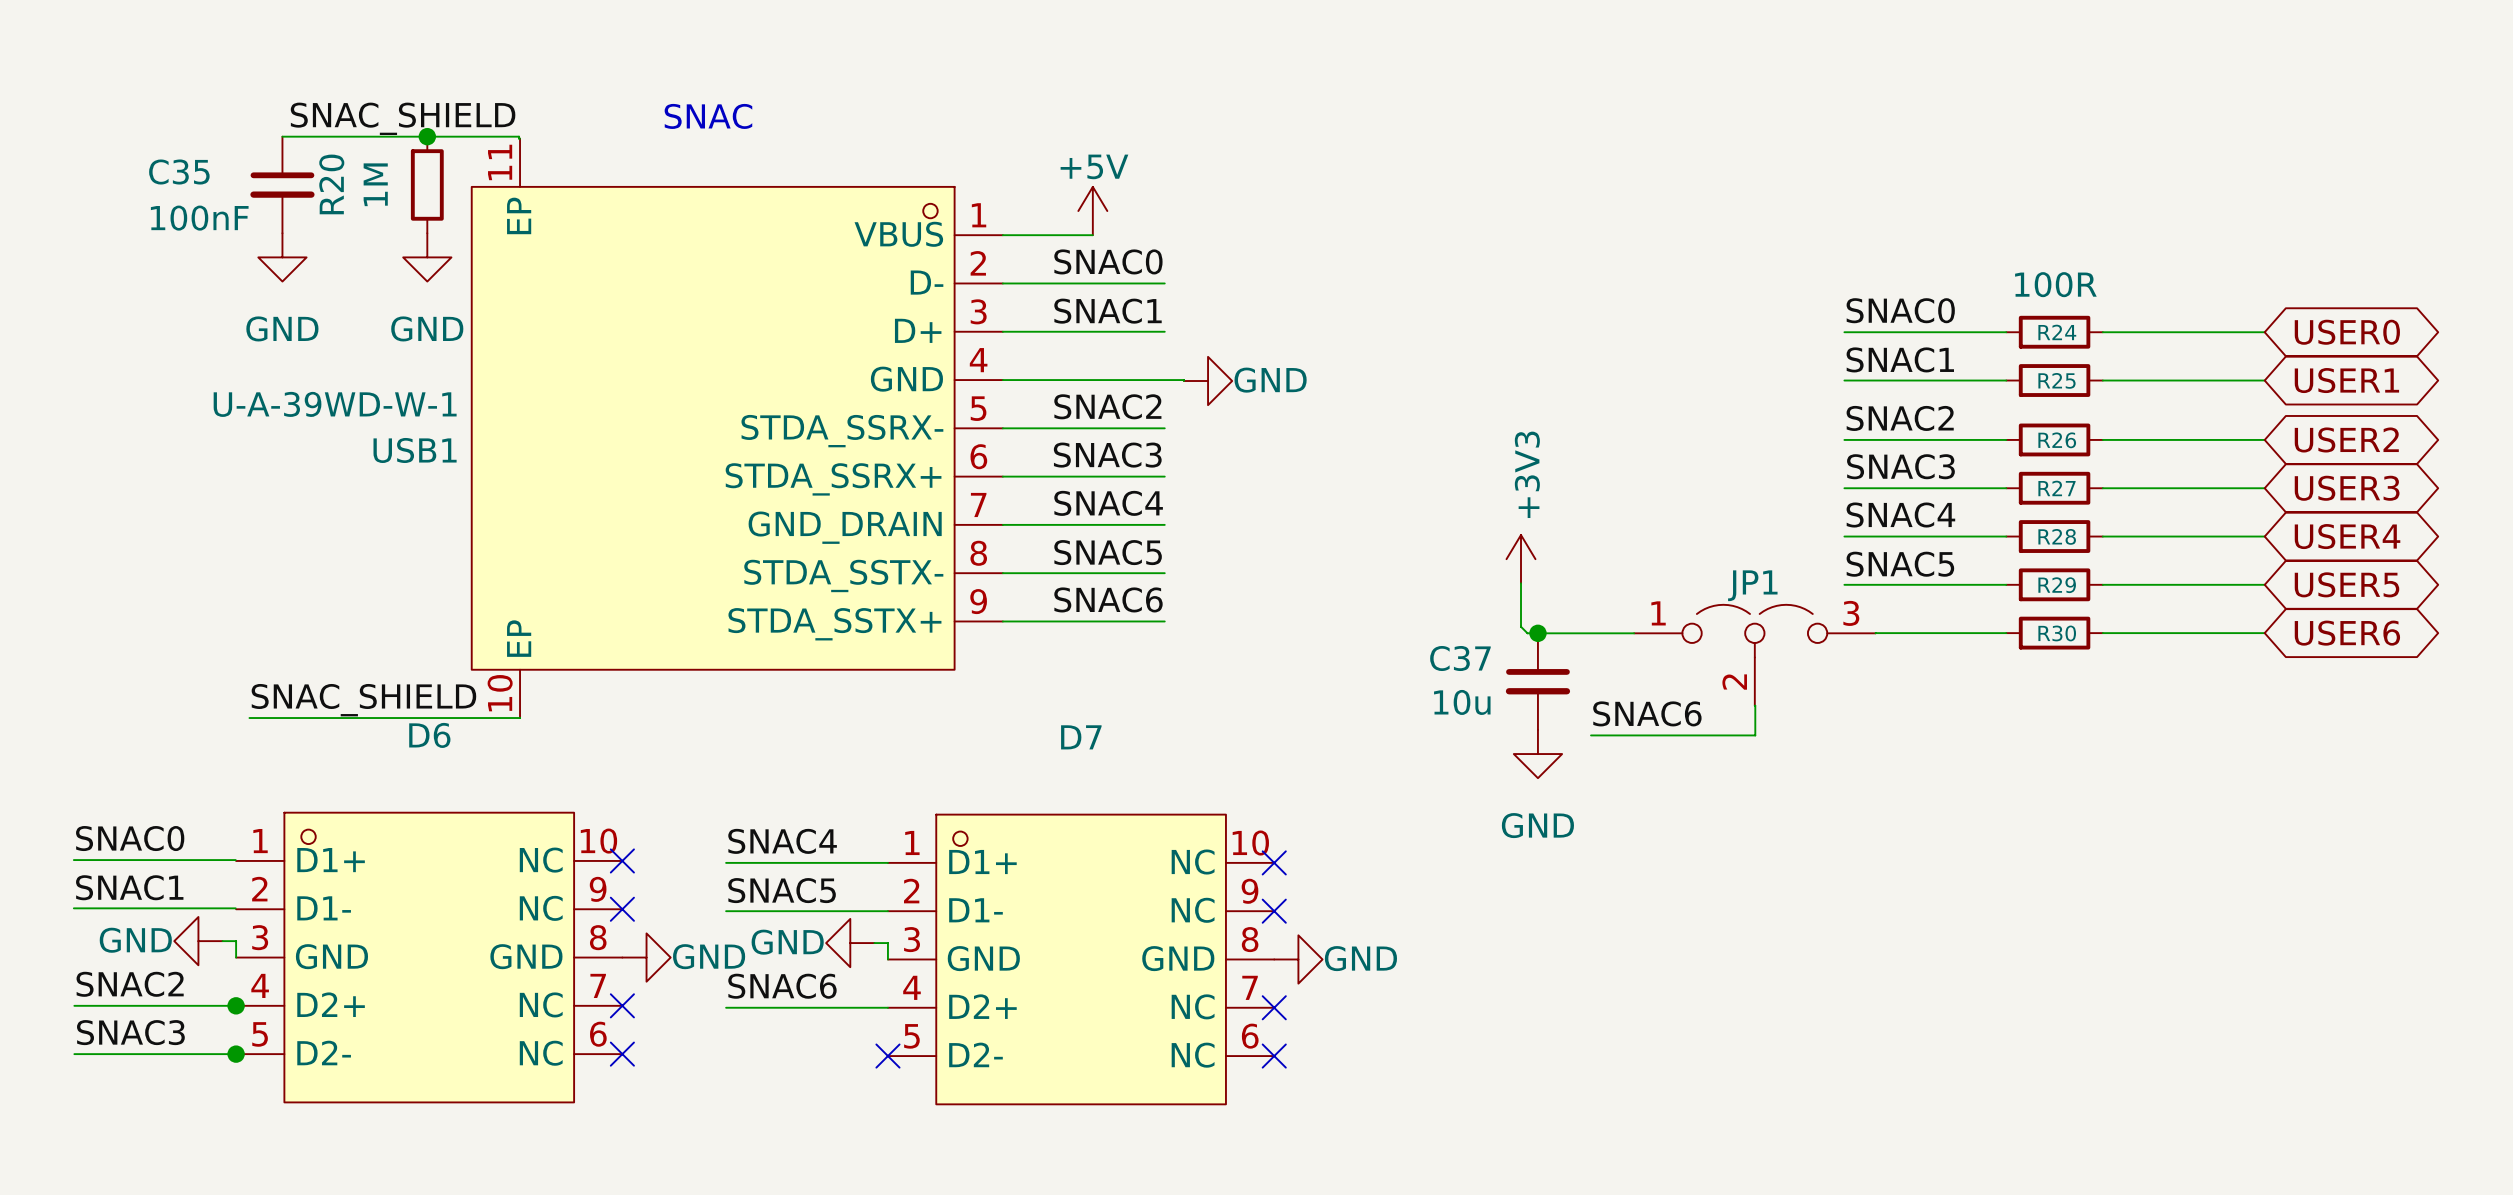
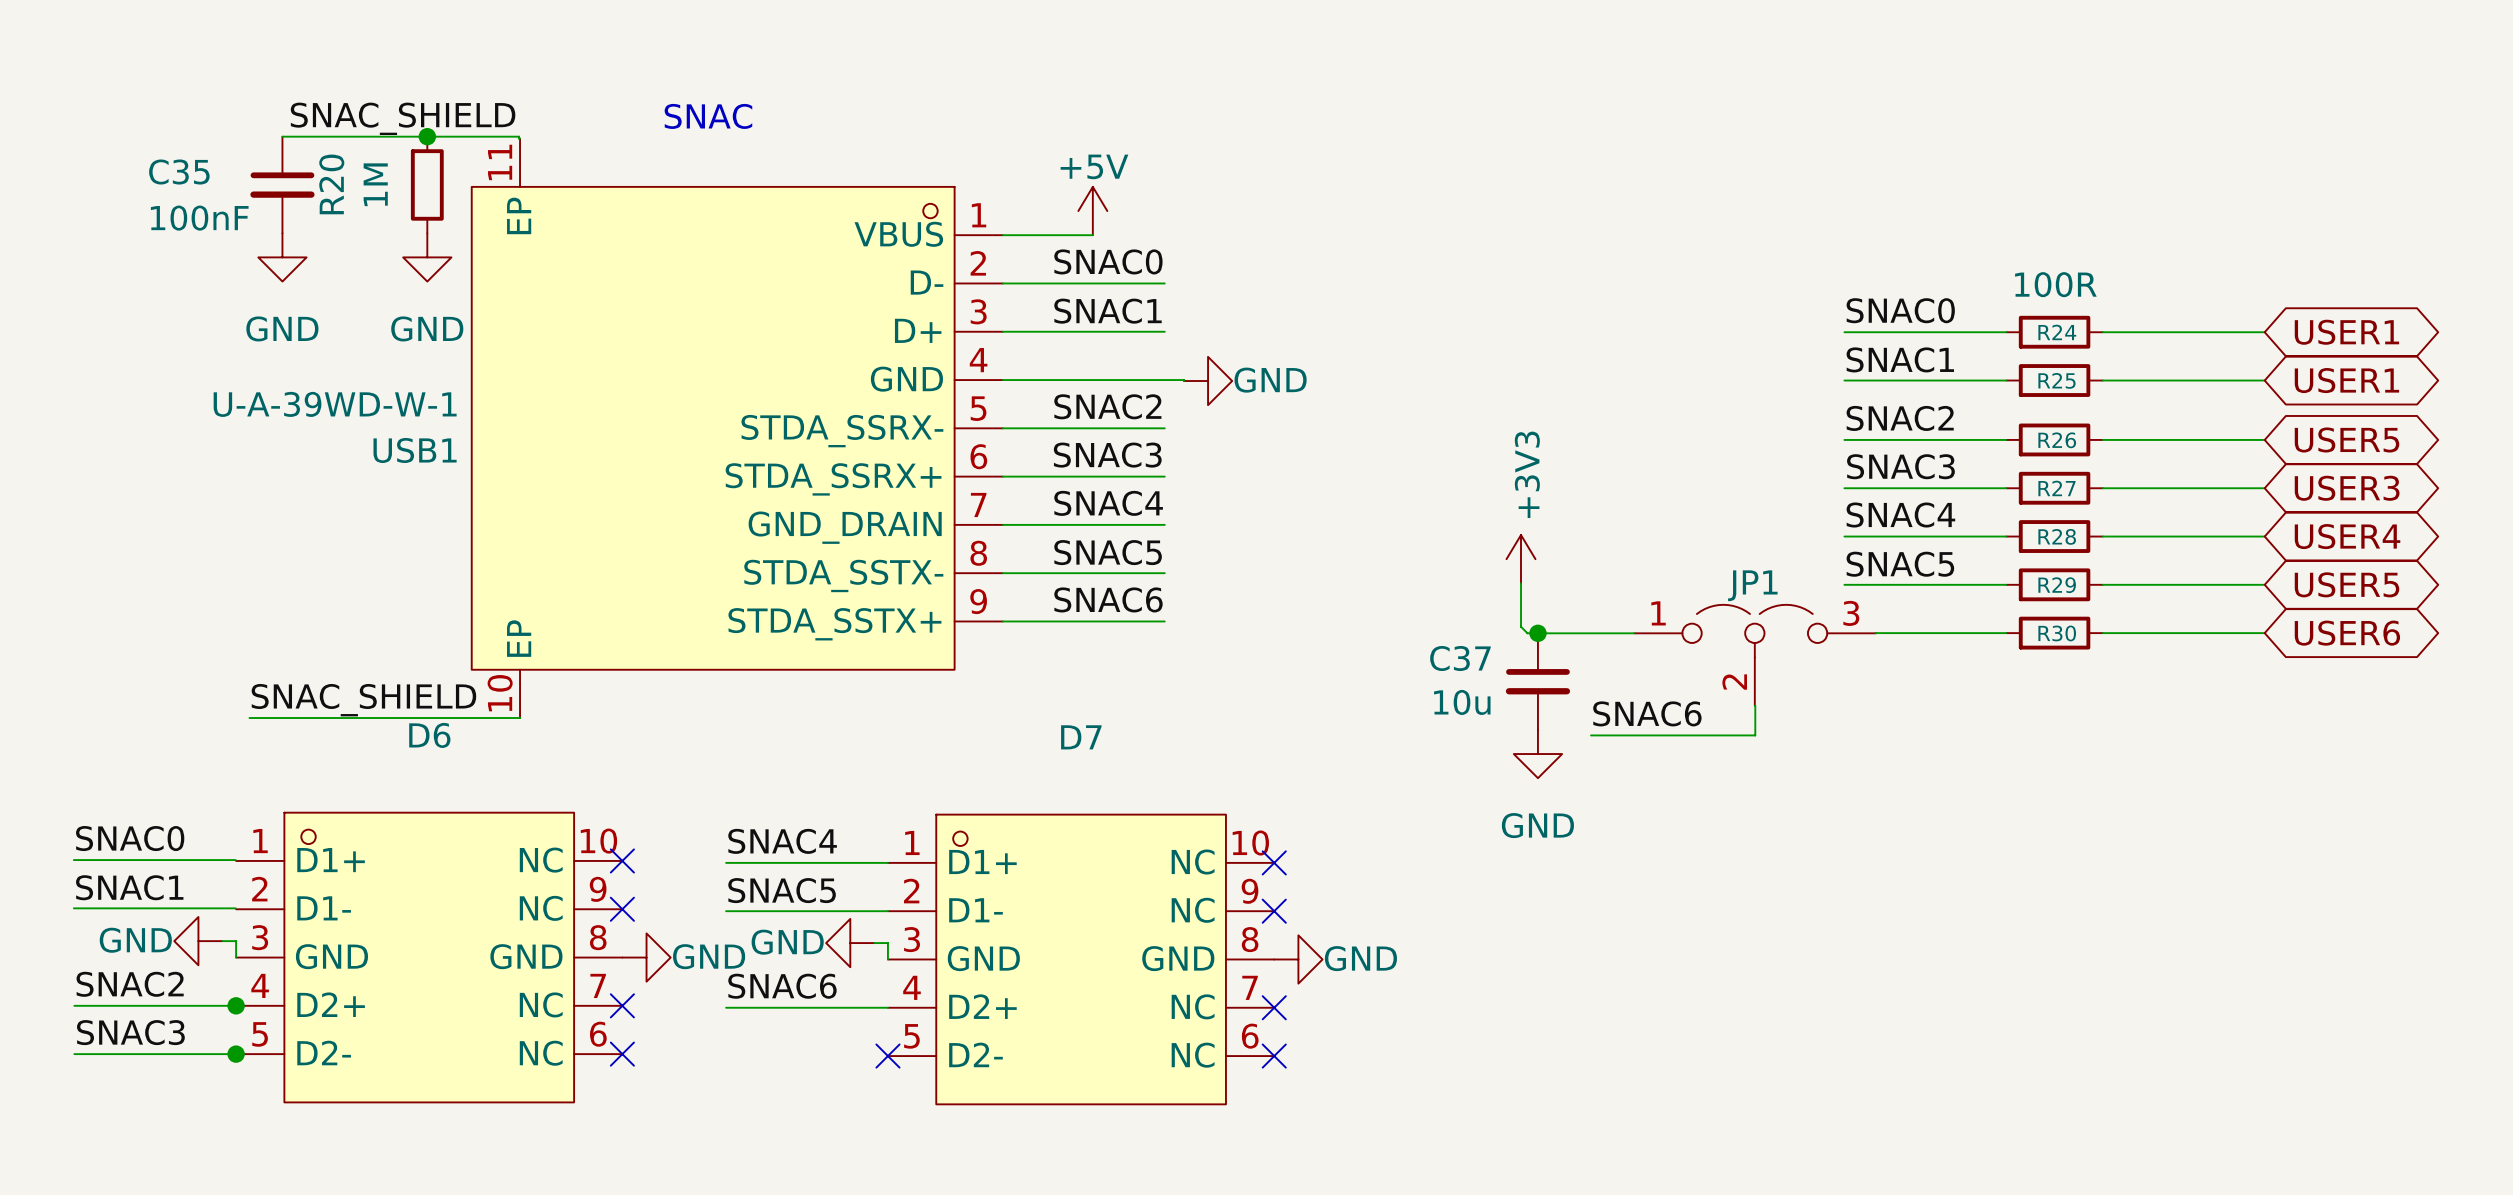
global label: USER0 (2347, 332) -> USER1 (2346, 332)
global label: USER2 (2346, 439) -> USER5 (2347, 439)

